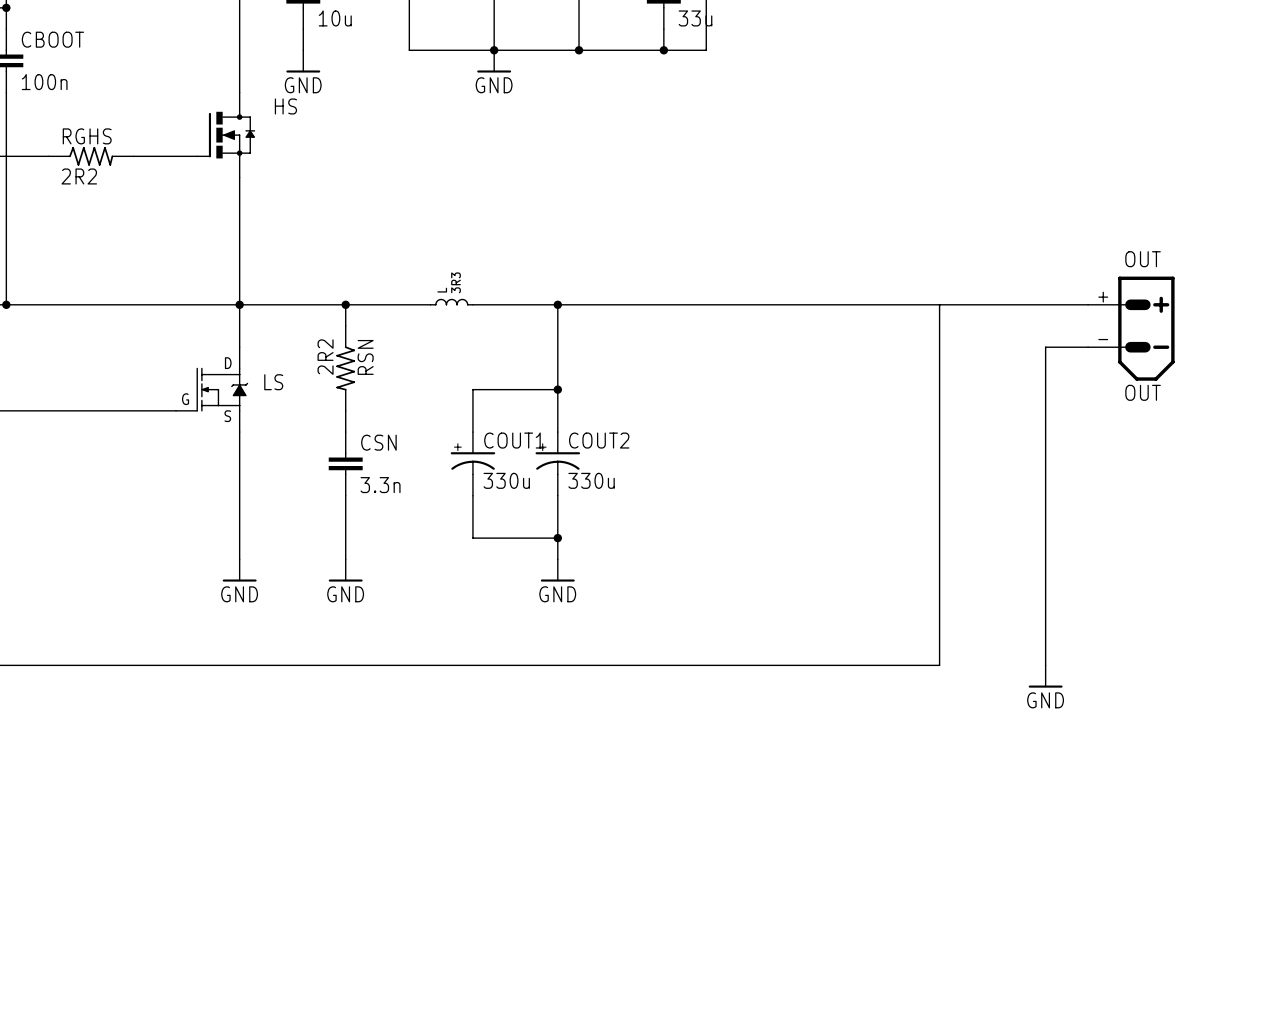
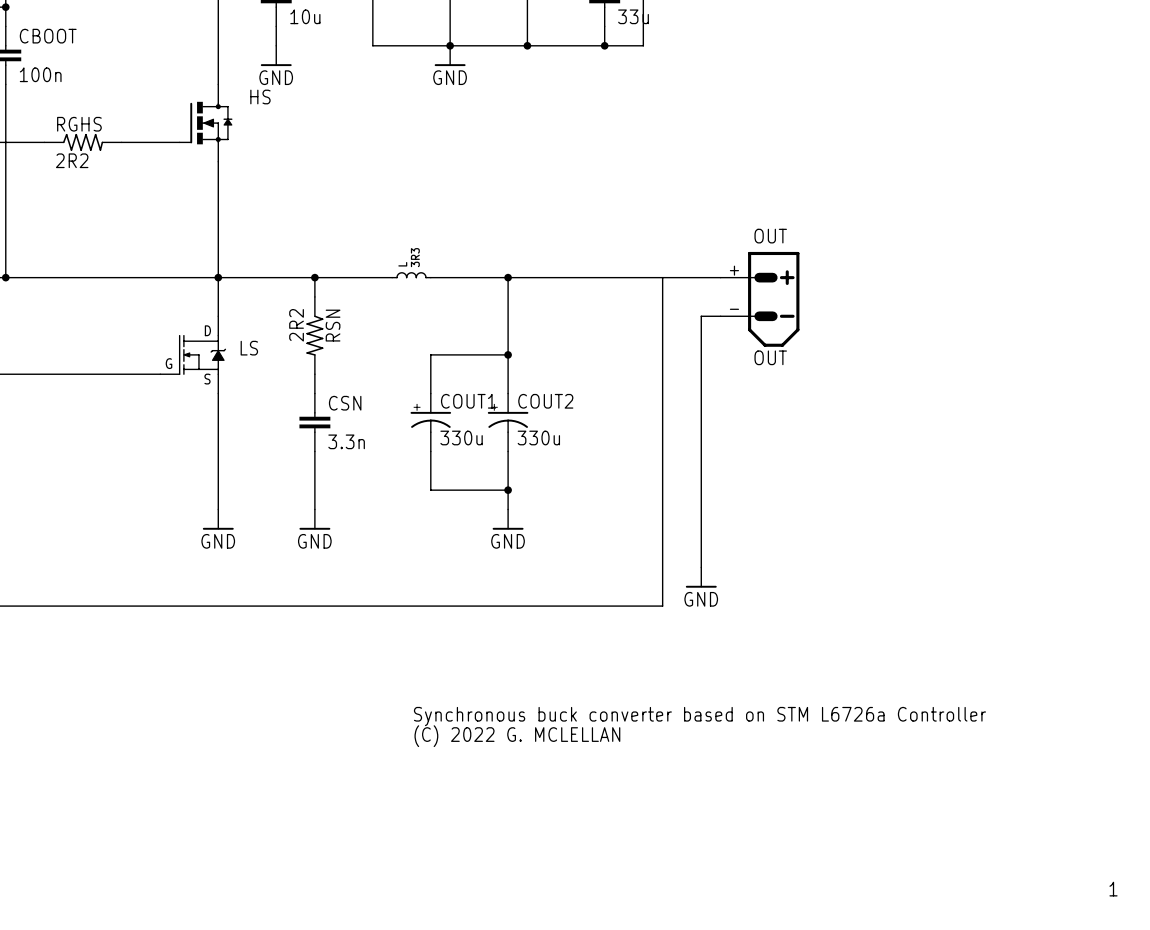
wire: (791, 304) (1088, 304) -> none
wire: (939, 304) (939, 665) (727, 665) -> (662, 277) (662, 606)
OUT: none -> OUT (760, 299)
OUT: OUT (1131, 328) -> none
wire: none -> (720, 316) (701, 316) (701, 567)
wire: (1088, 347) (1045, 347) (1045, 665) -> none
power symbol: none -> GND (701, 577)
power symbol: GND (1045, 676) -> none
text: none -> Synchronous buck converter based on STM L6726a Controller (699, 716)
text: none -> (C) 2022 G. MCLELLAN (517, 736)
text: none -> 1 (1113, 889)

